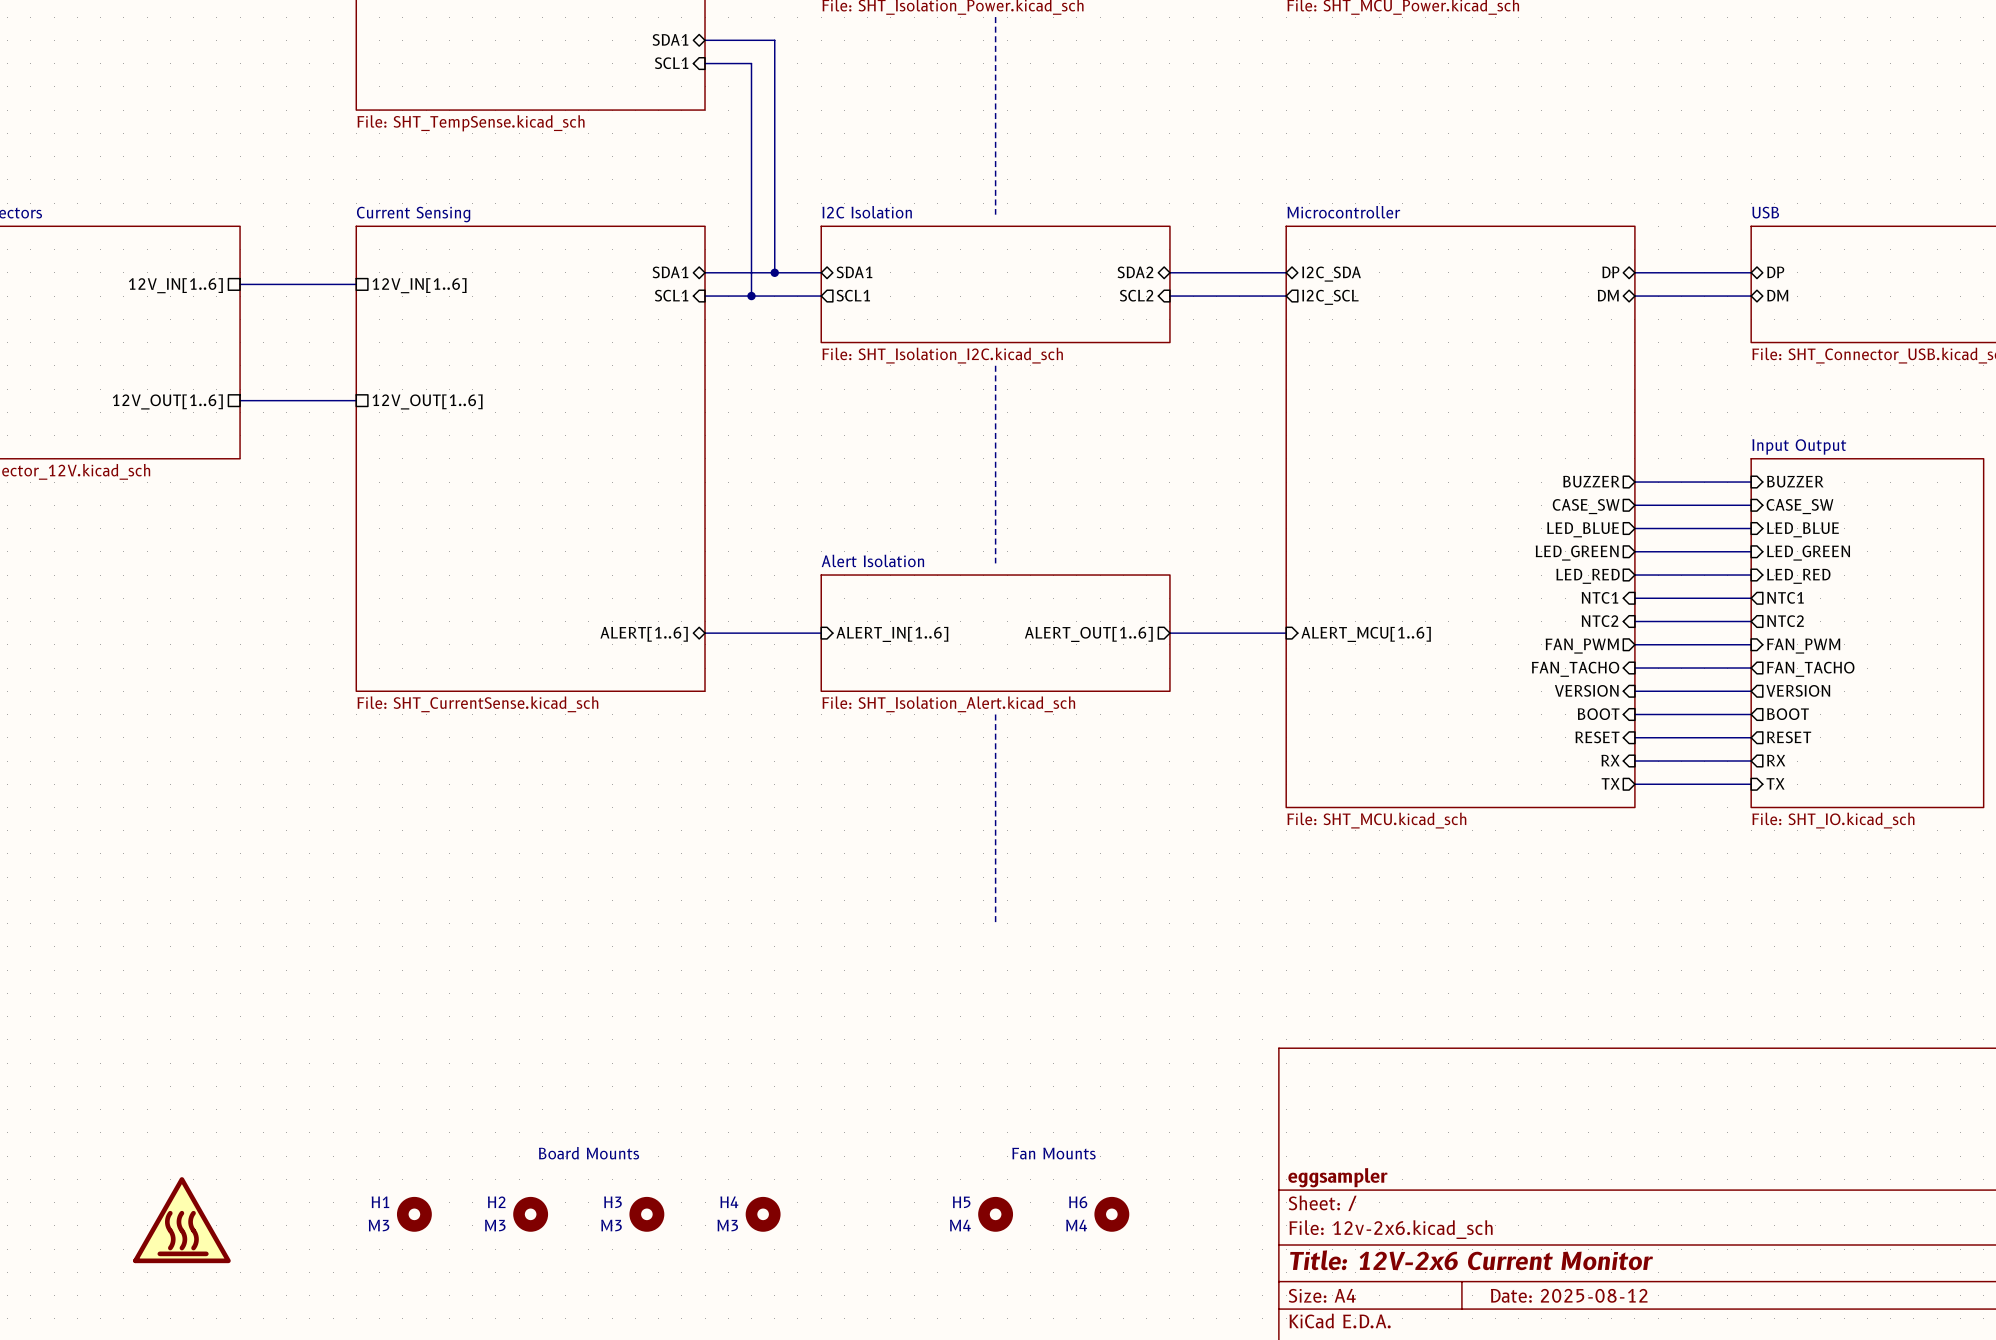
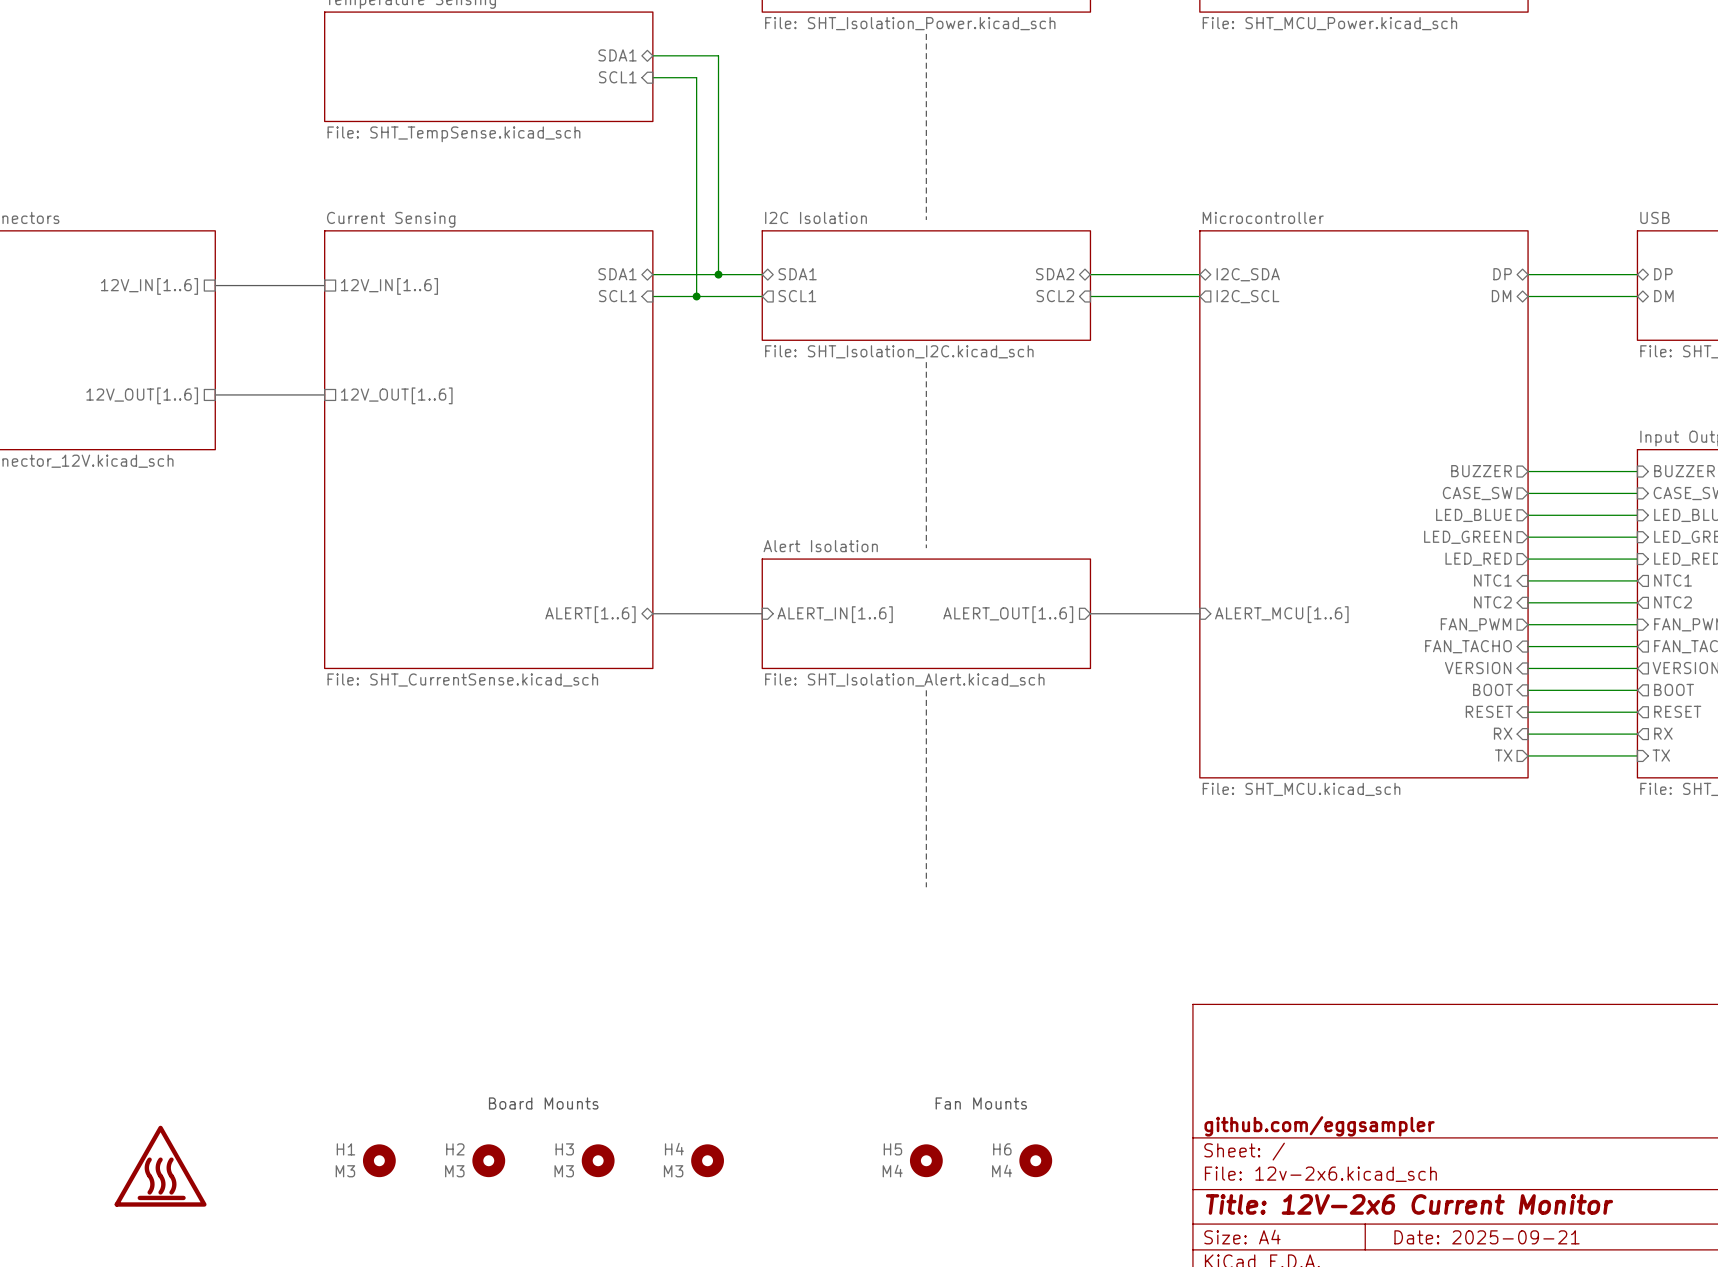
title block: eggsampler (1337, 1177) -> github.com/eggsampler (1319, 1126)
title block: Date: 2025-08-12 (1569, 1295) -> Date: 2025-09-21 (1487, 1237)

